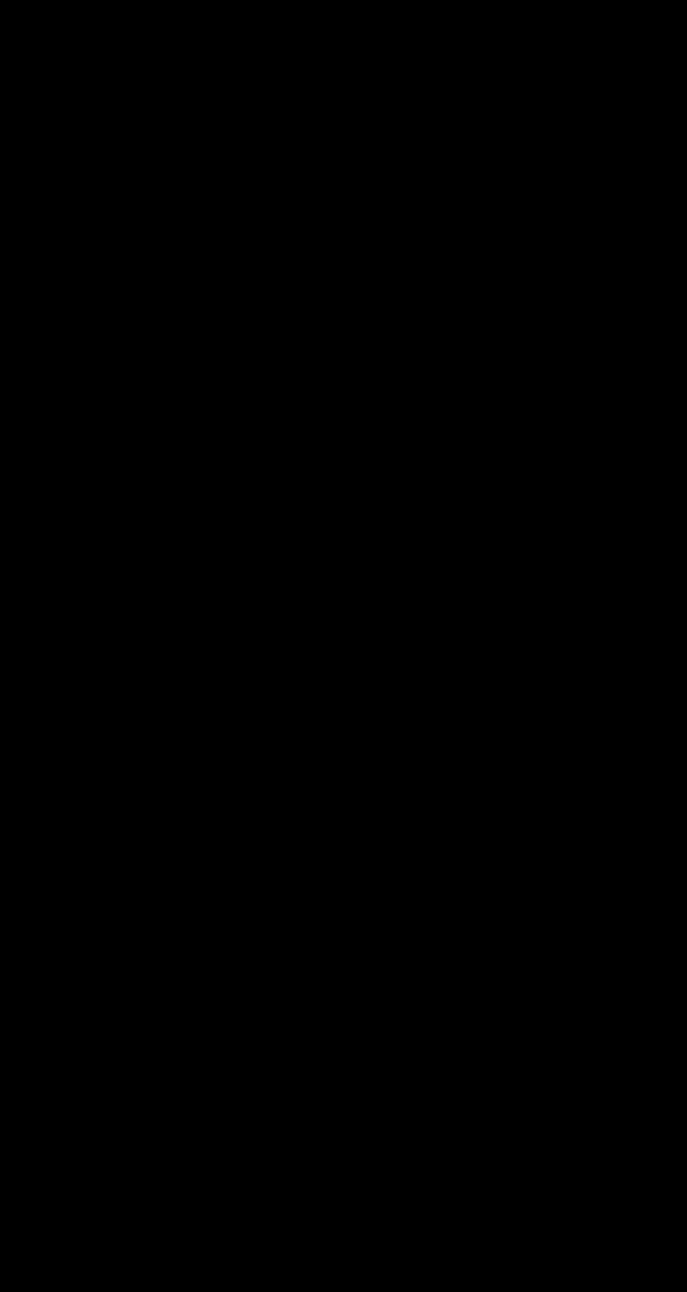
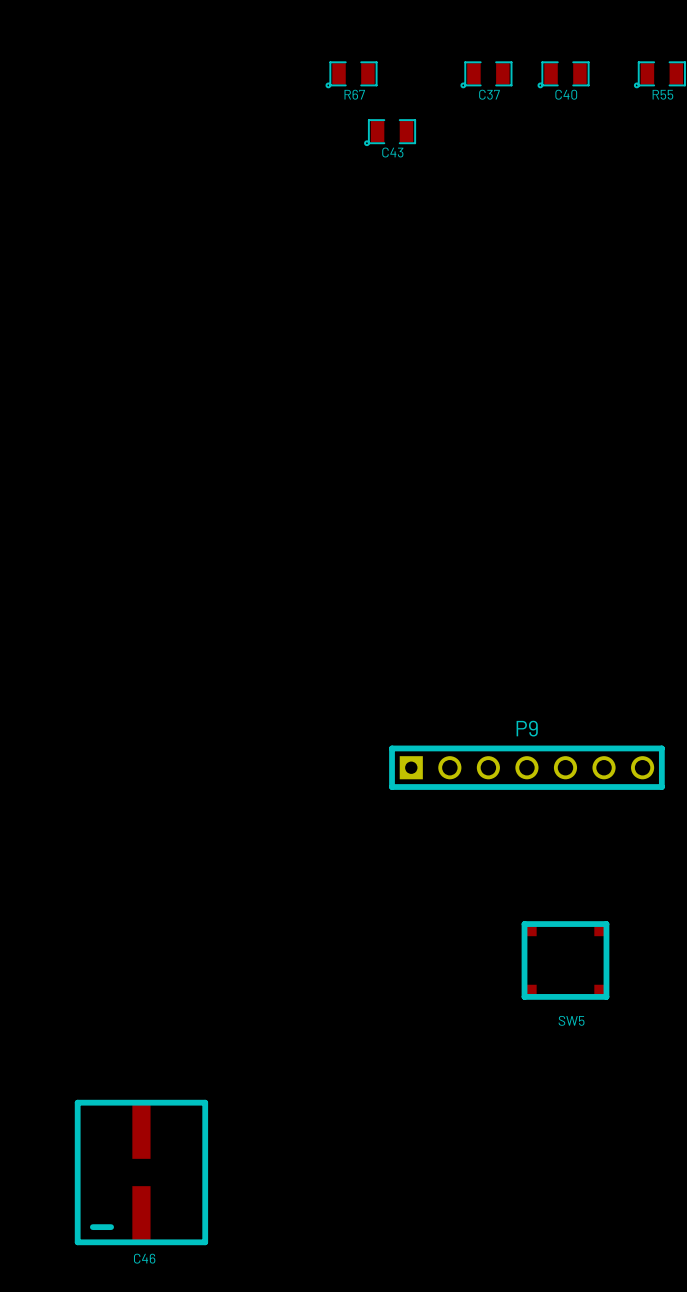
R67: none -> (351, 74)
C37: none -> (486, 74)
C40: none -> (563, 74)
R55: none -> (659, 74)
C43: none -> (390, 132)
P9: none -> (526, 767)
SW5: none -> (565, 960)
C46: none -> (141, 1172)

